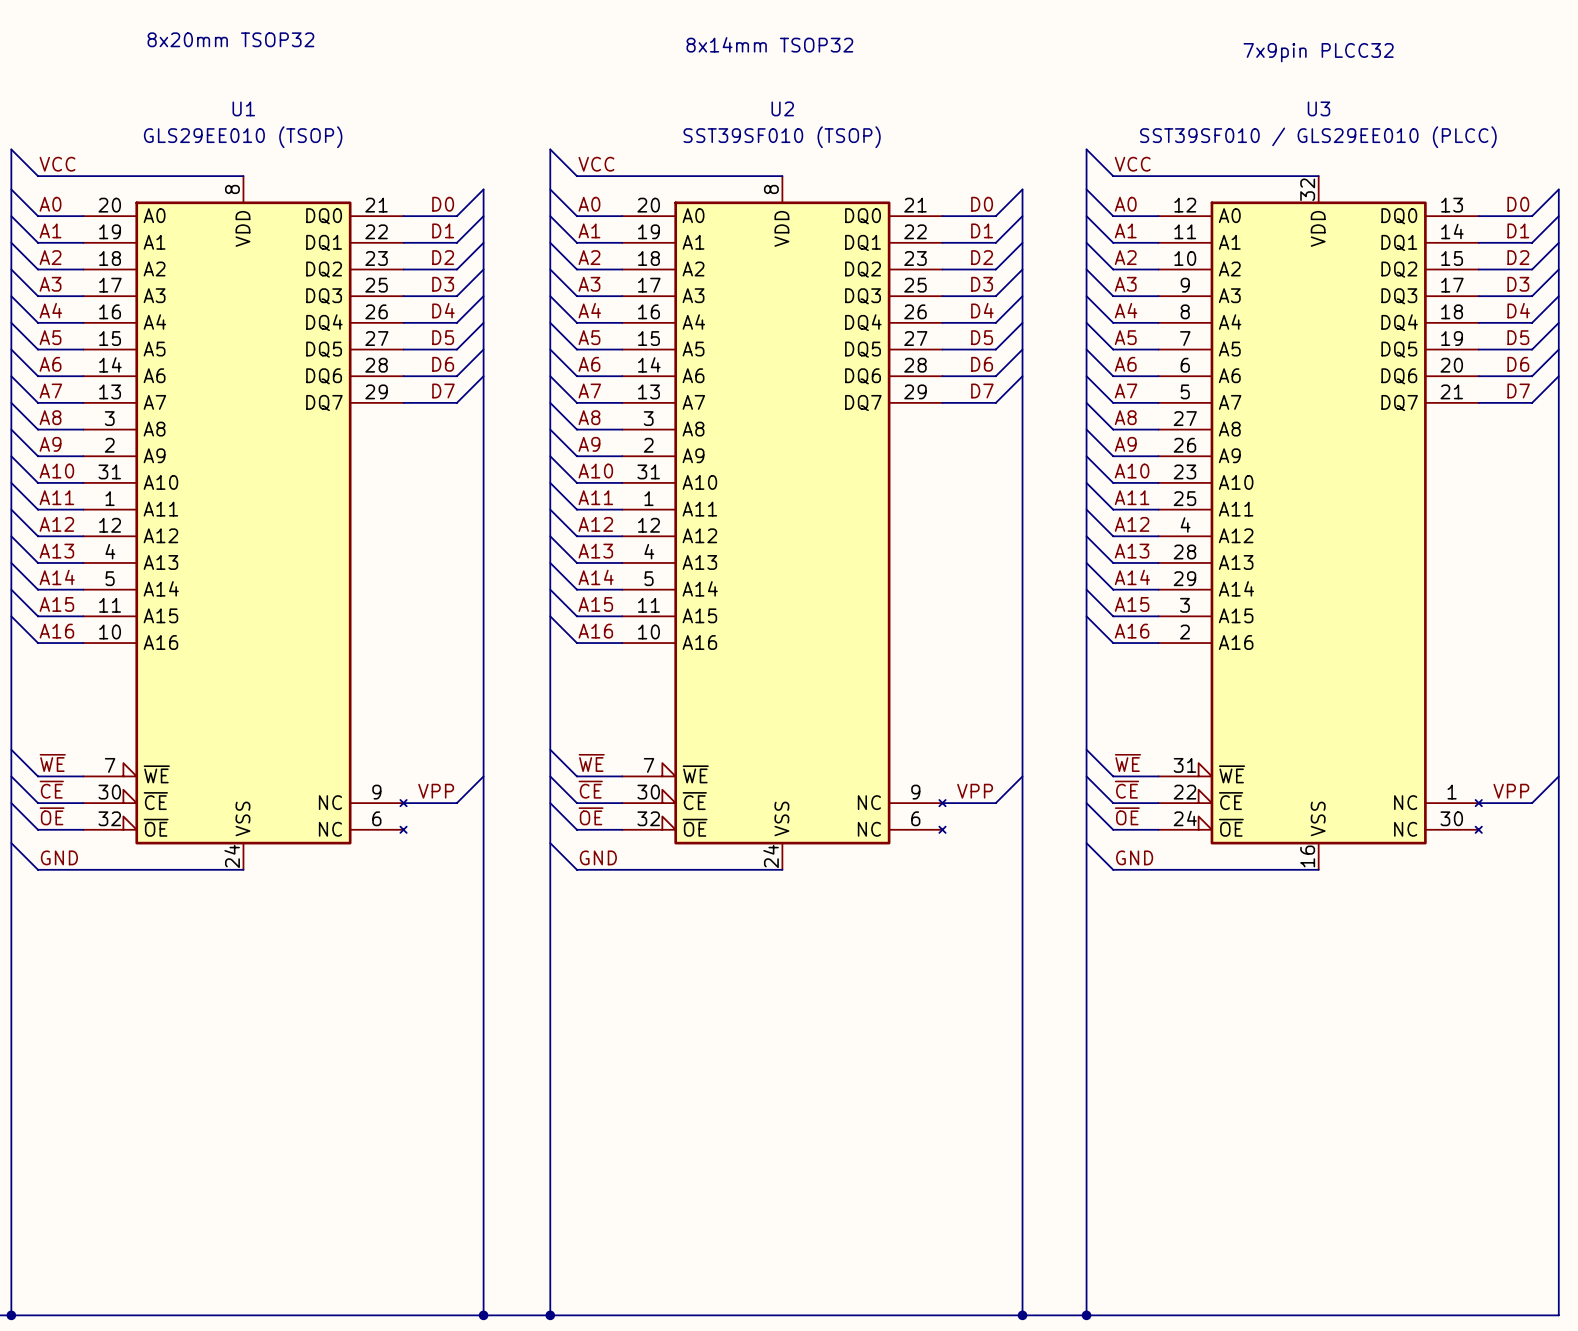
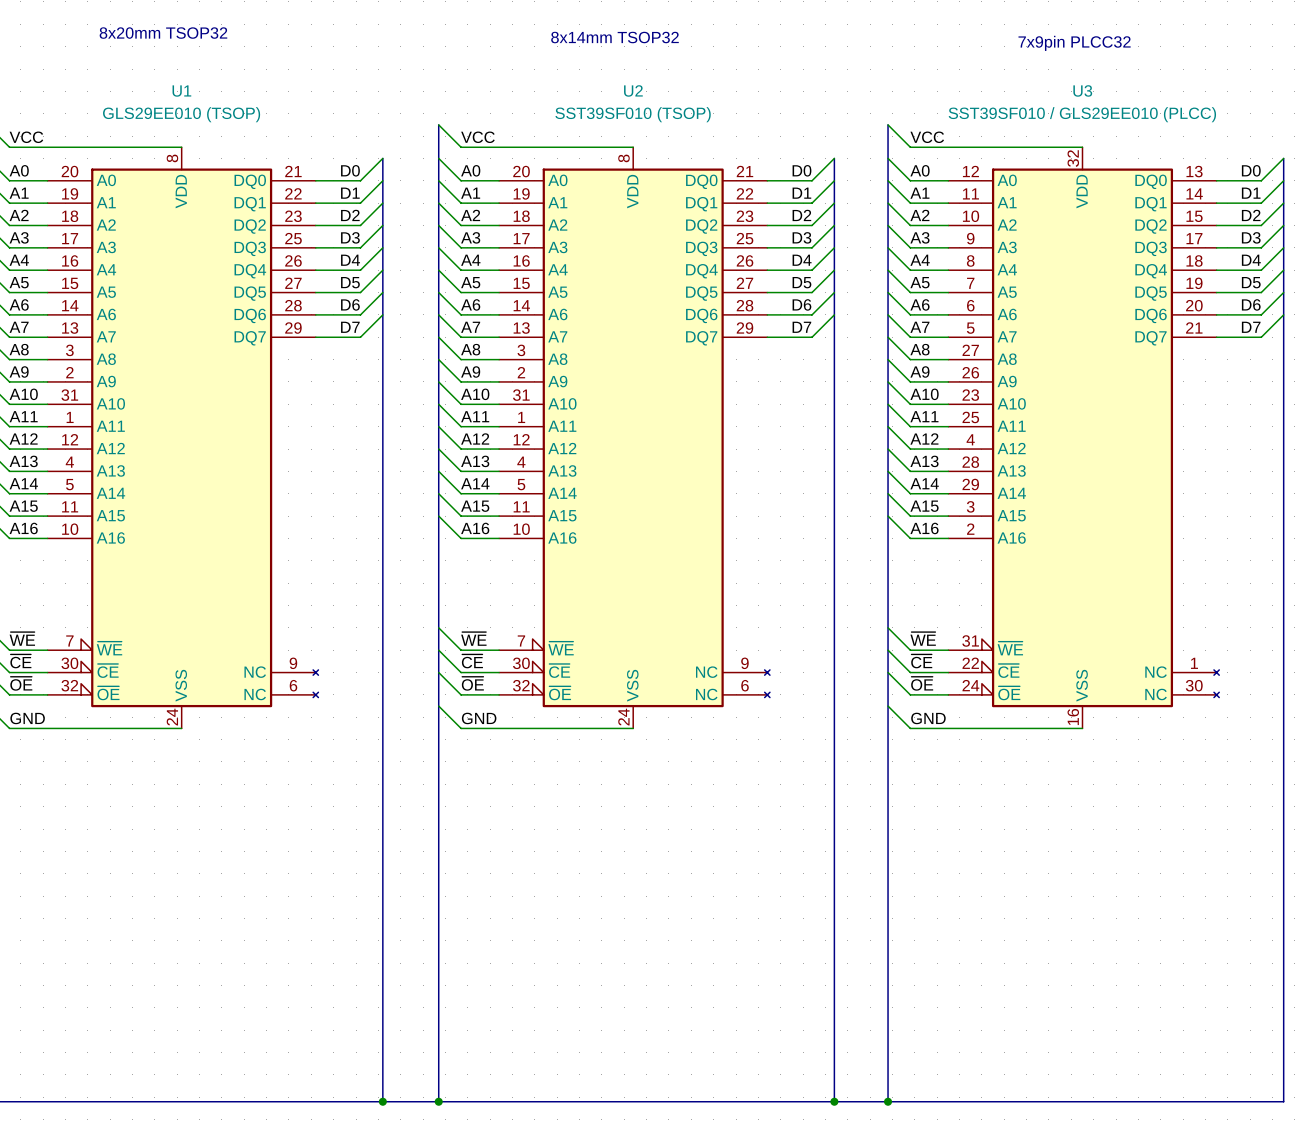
wire: (483, 776) (456, 803) (403, 803) -> none
wire: (1022, 776) (995, 803) (942, 803) -> none
wire: (1558, 776) (1532, 803) (1478, 803) -> none
label: VPP (436, 791) -> none
label: VPP (975, 791) -> none
label: VPP (1511, 791) -> none

